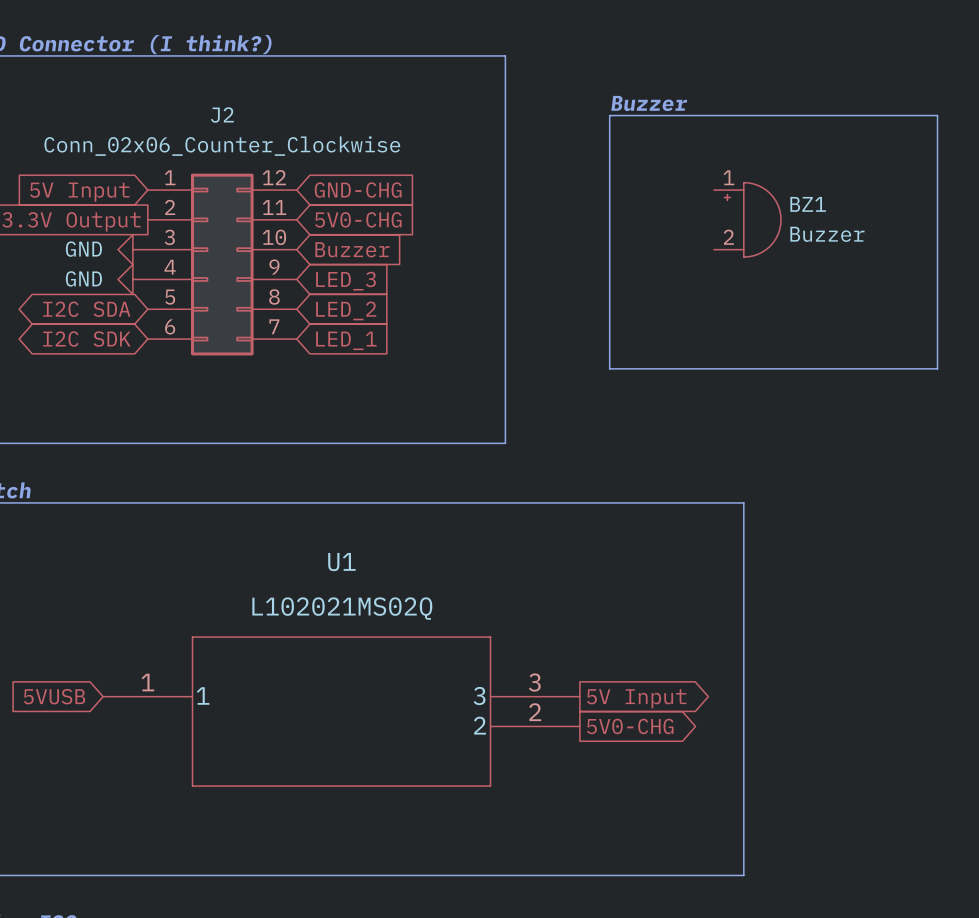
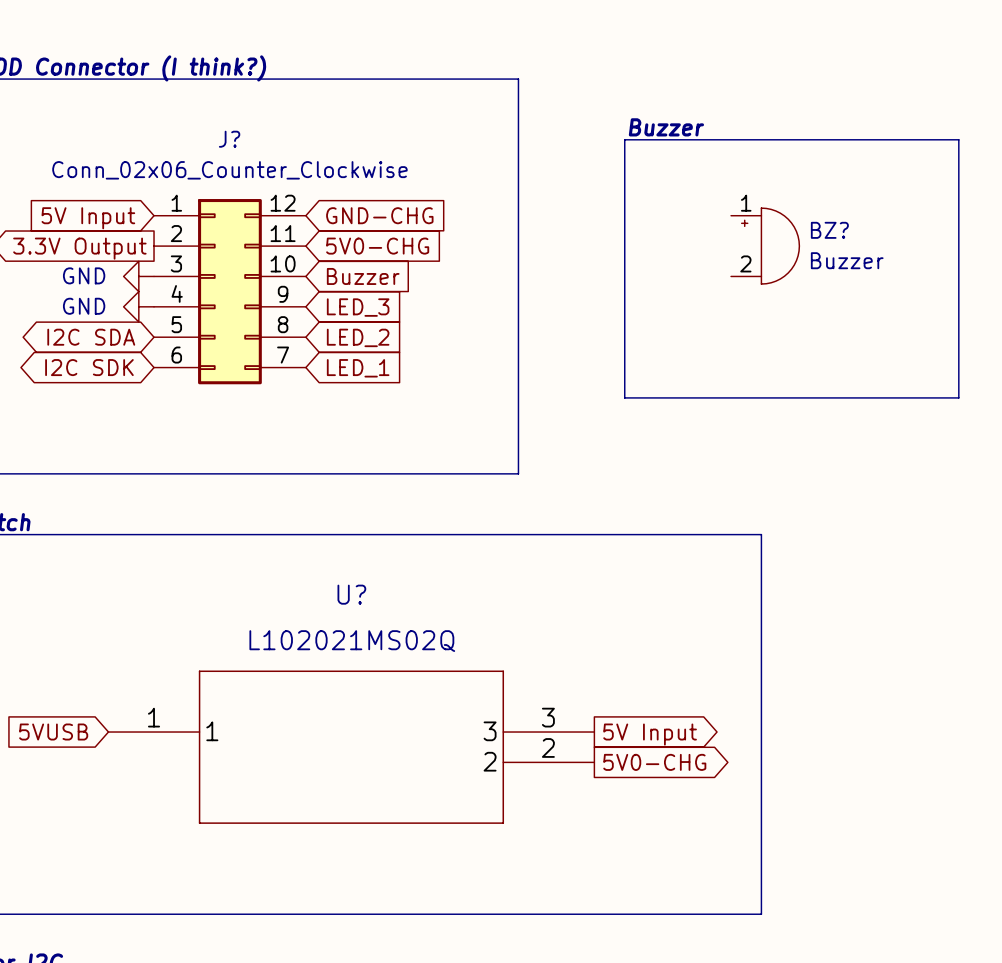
J2 name: J2 (222, 115) -> J? (229, 139)
BZ1 name: BZ1 (808, 204) -> BZ? (829, 230)
U1 name: U1 (341, 562) -> U? (351, 594)

